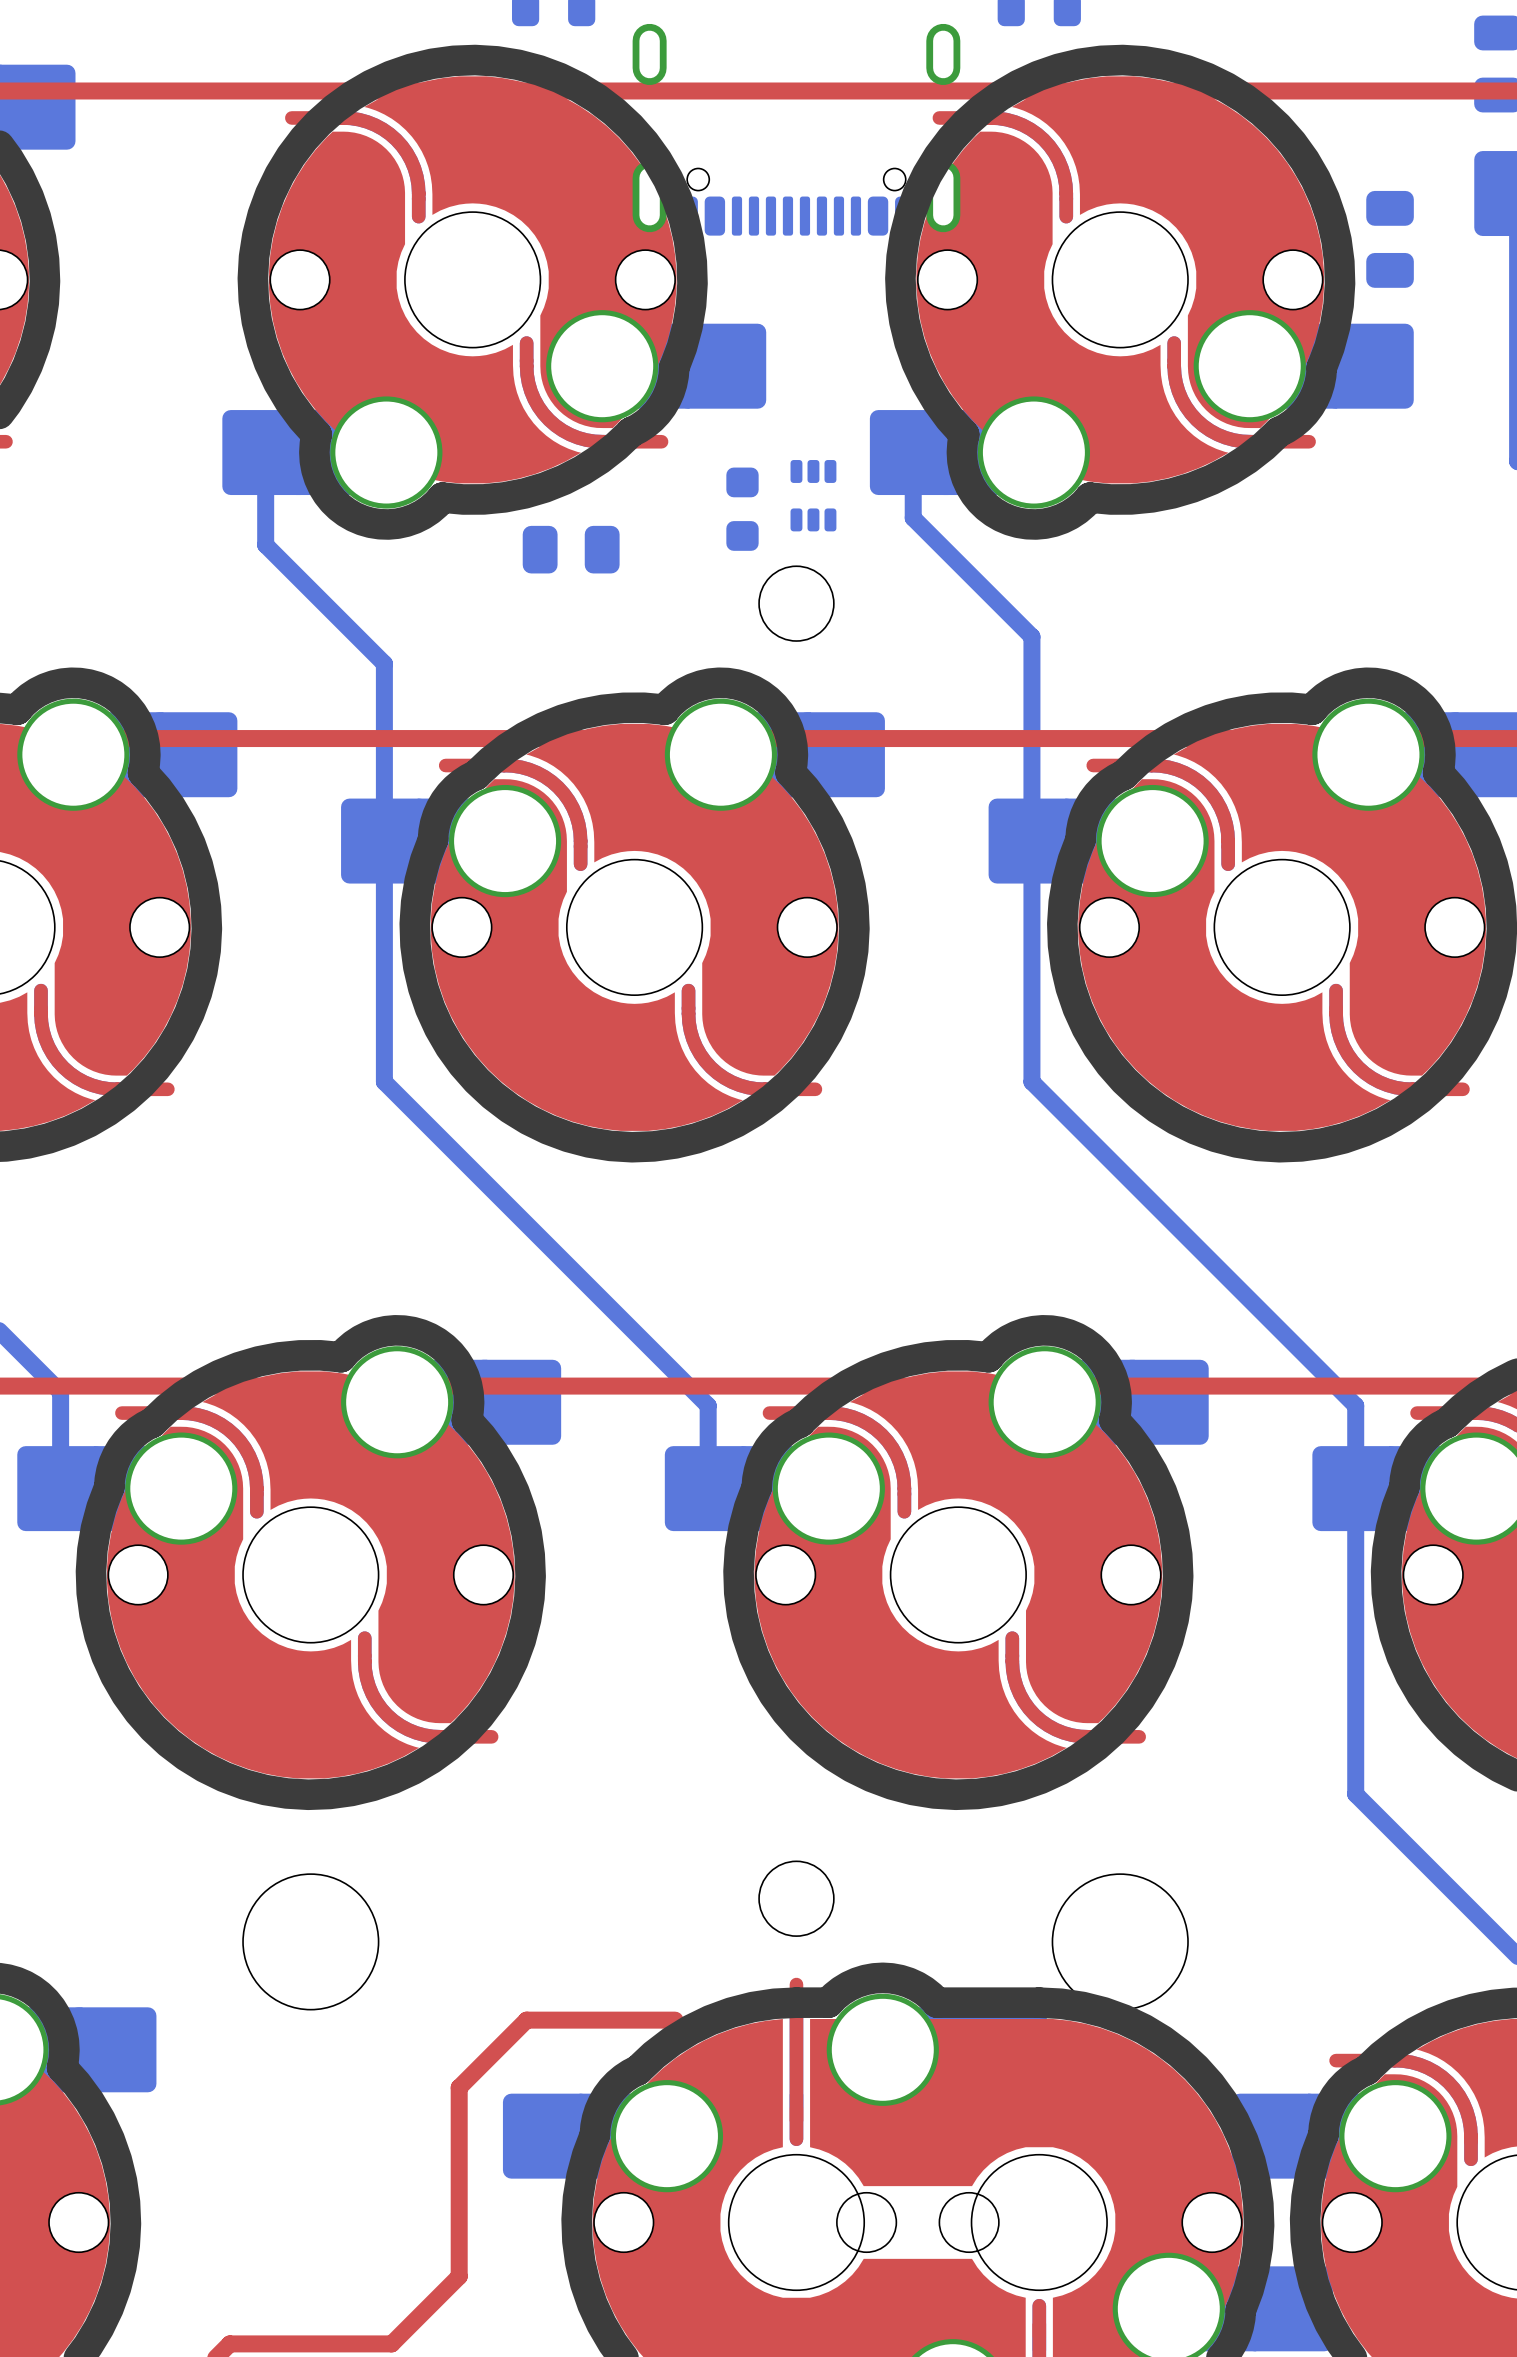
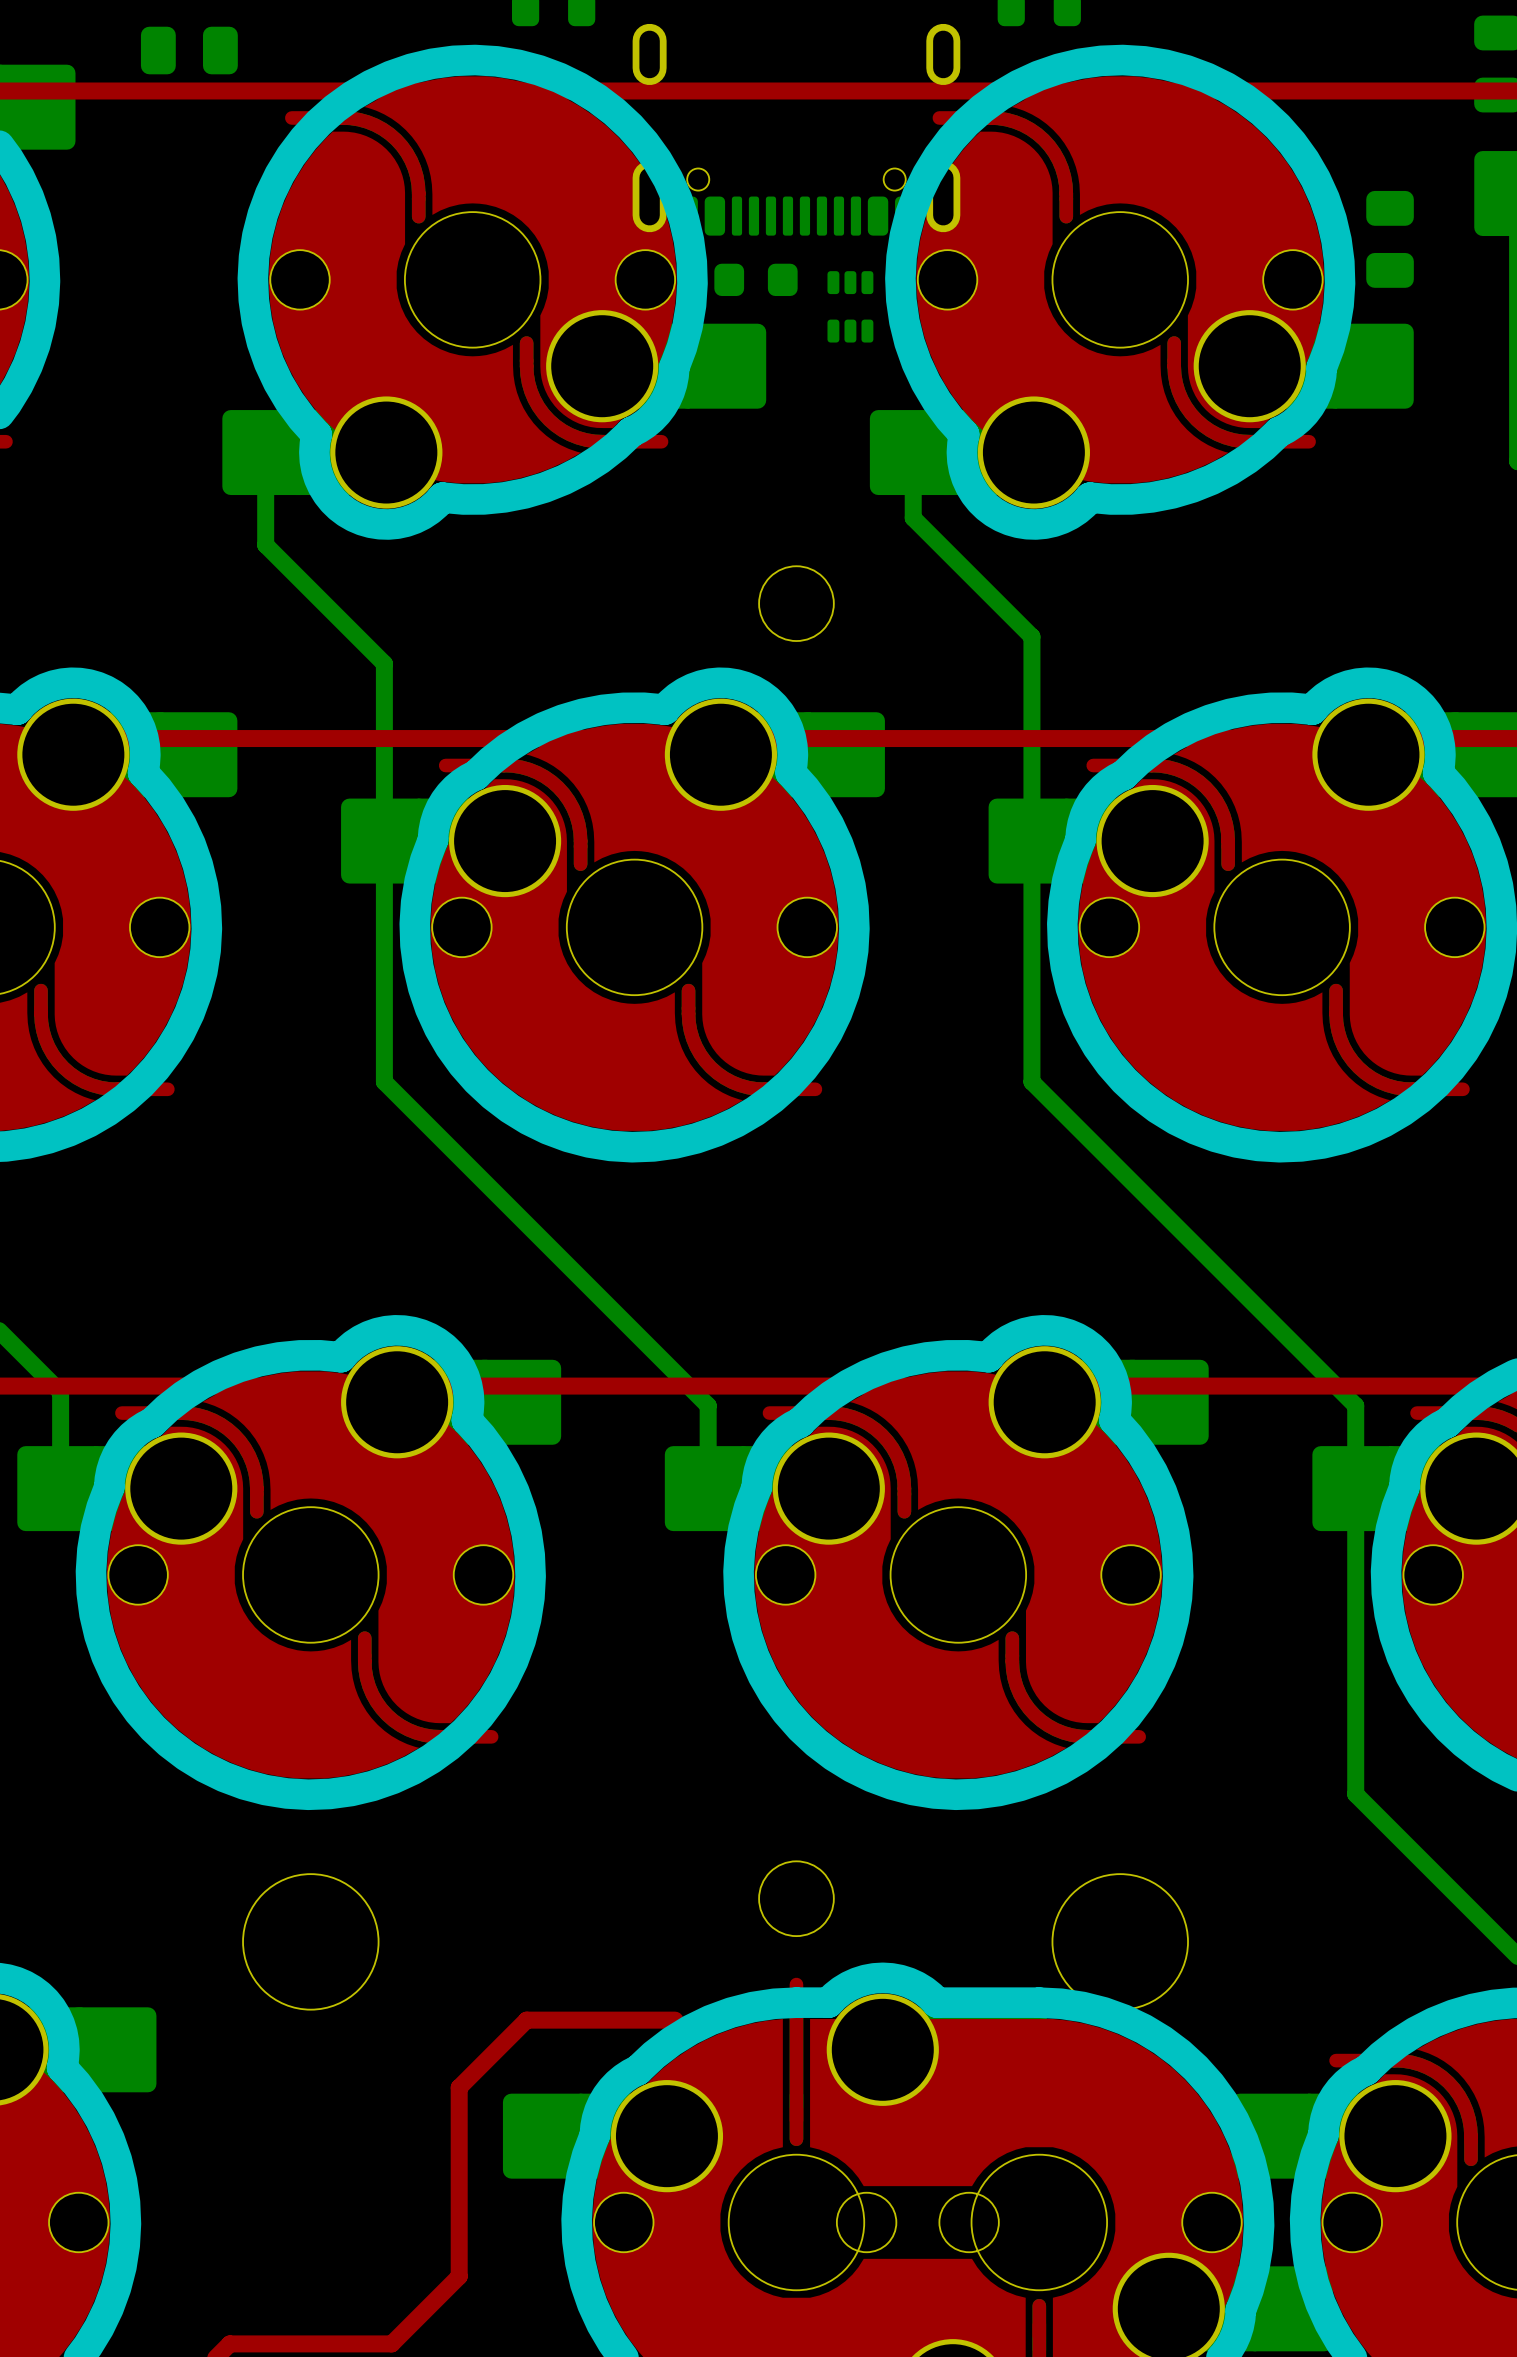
part position: (813, 495) -> (850, 306)
part rotation: 0° (742, 509) -> 90° clockwise (755, 279)
part position: (742, 509) -> (755, 279)
part position: (571, 549) -> (189, 50)

